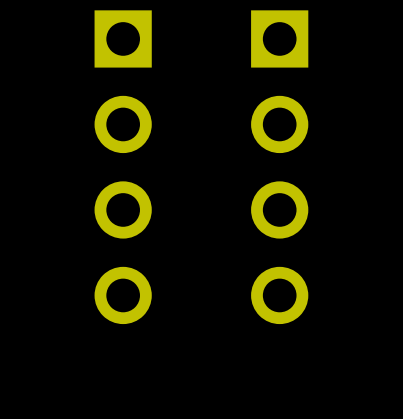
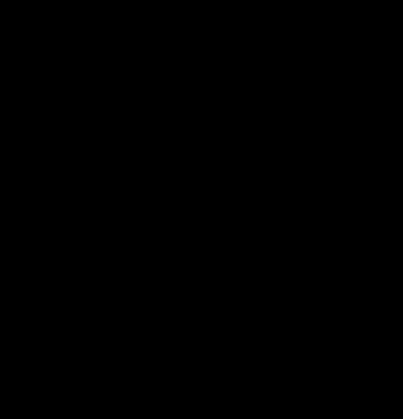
part: (123, 167) -> none
part: (279, 167) -> none

